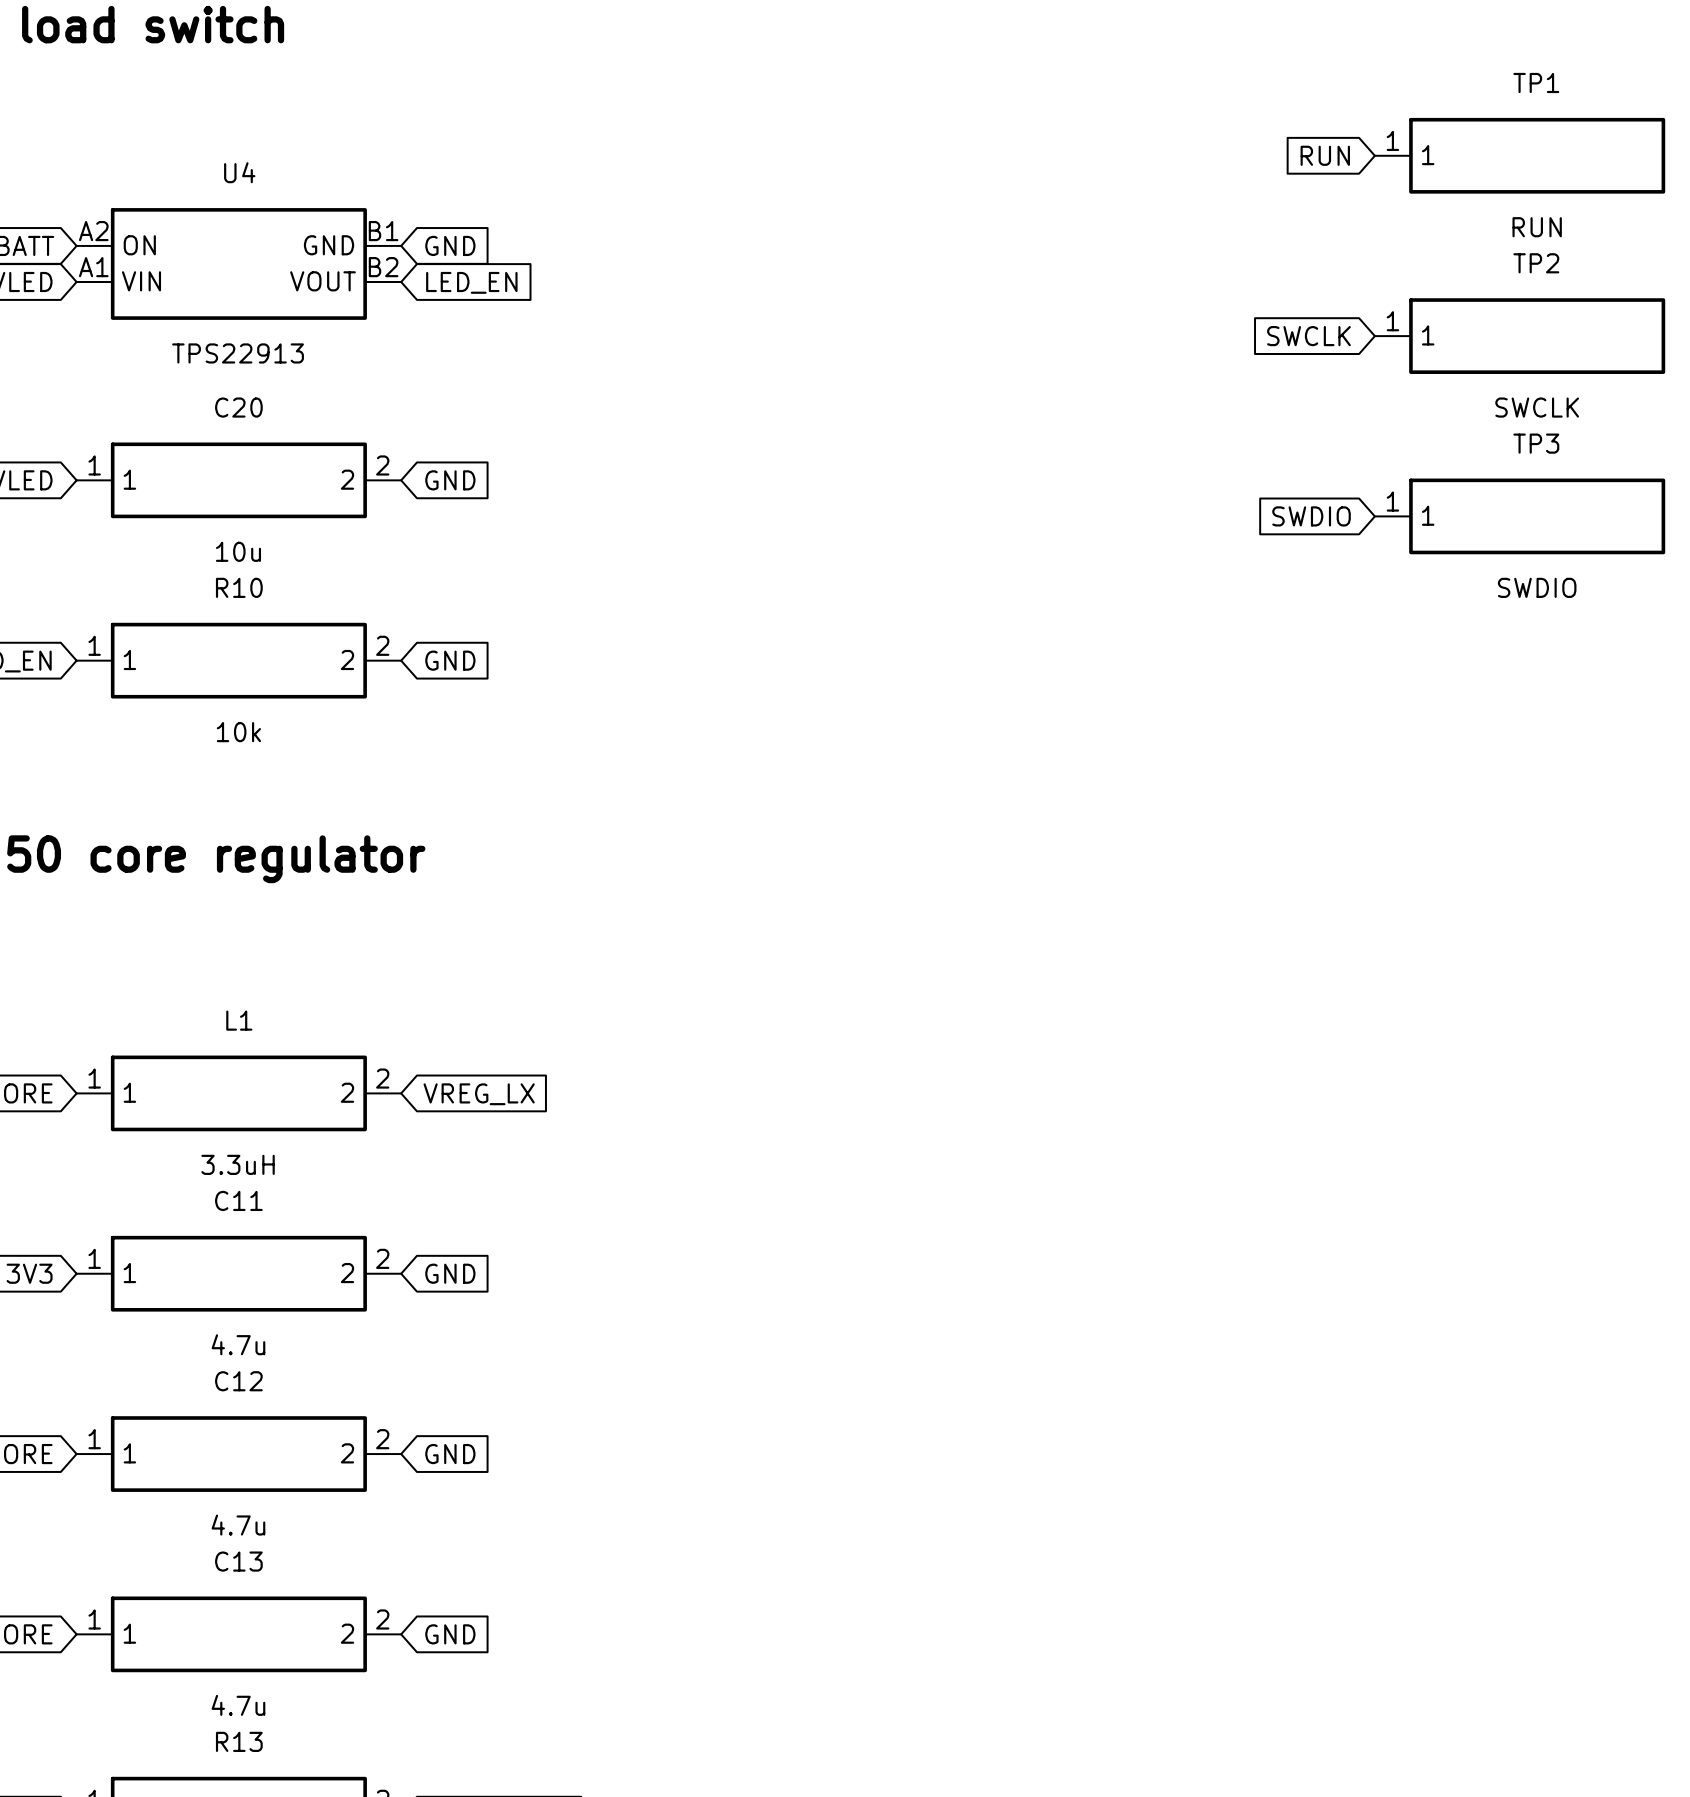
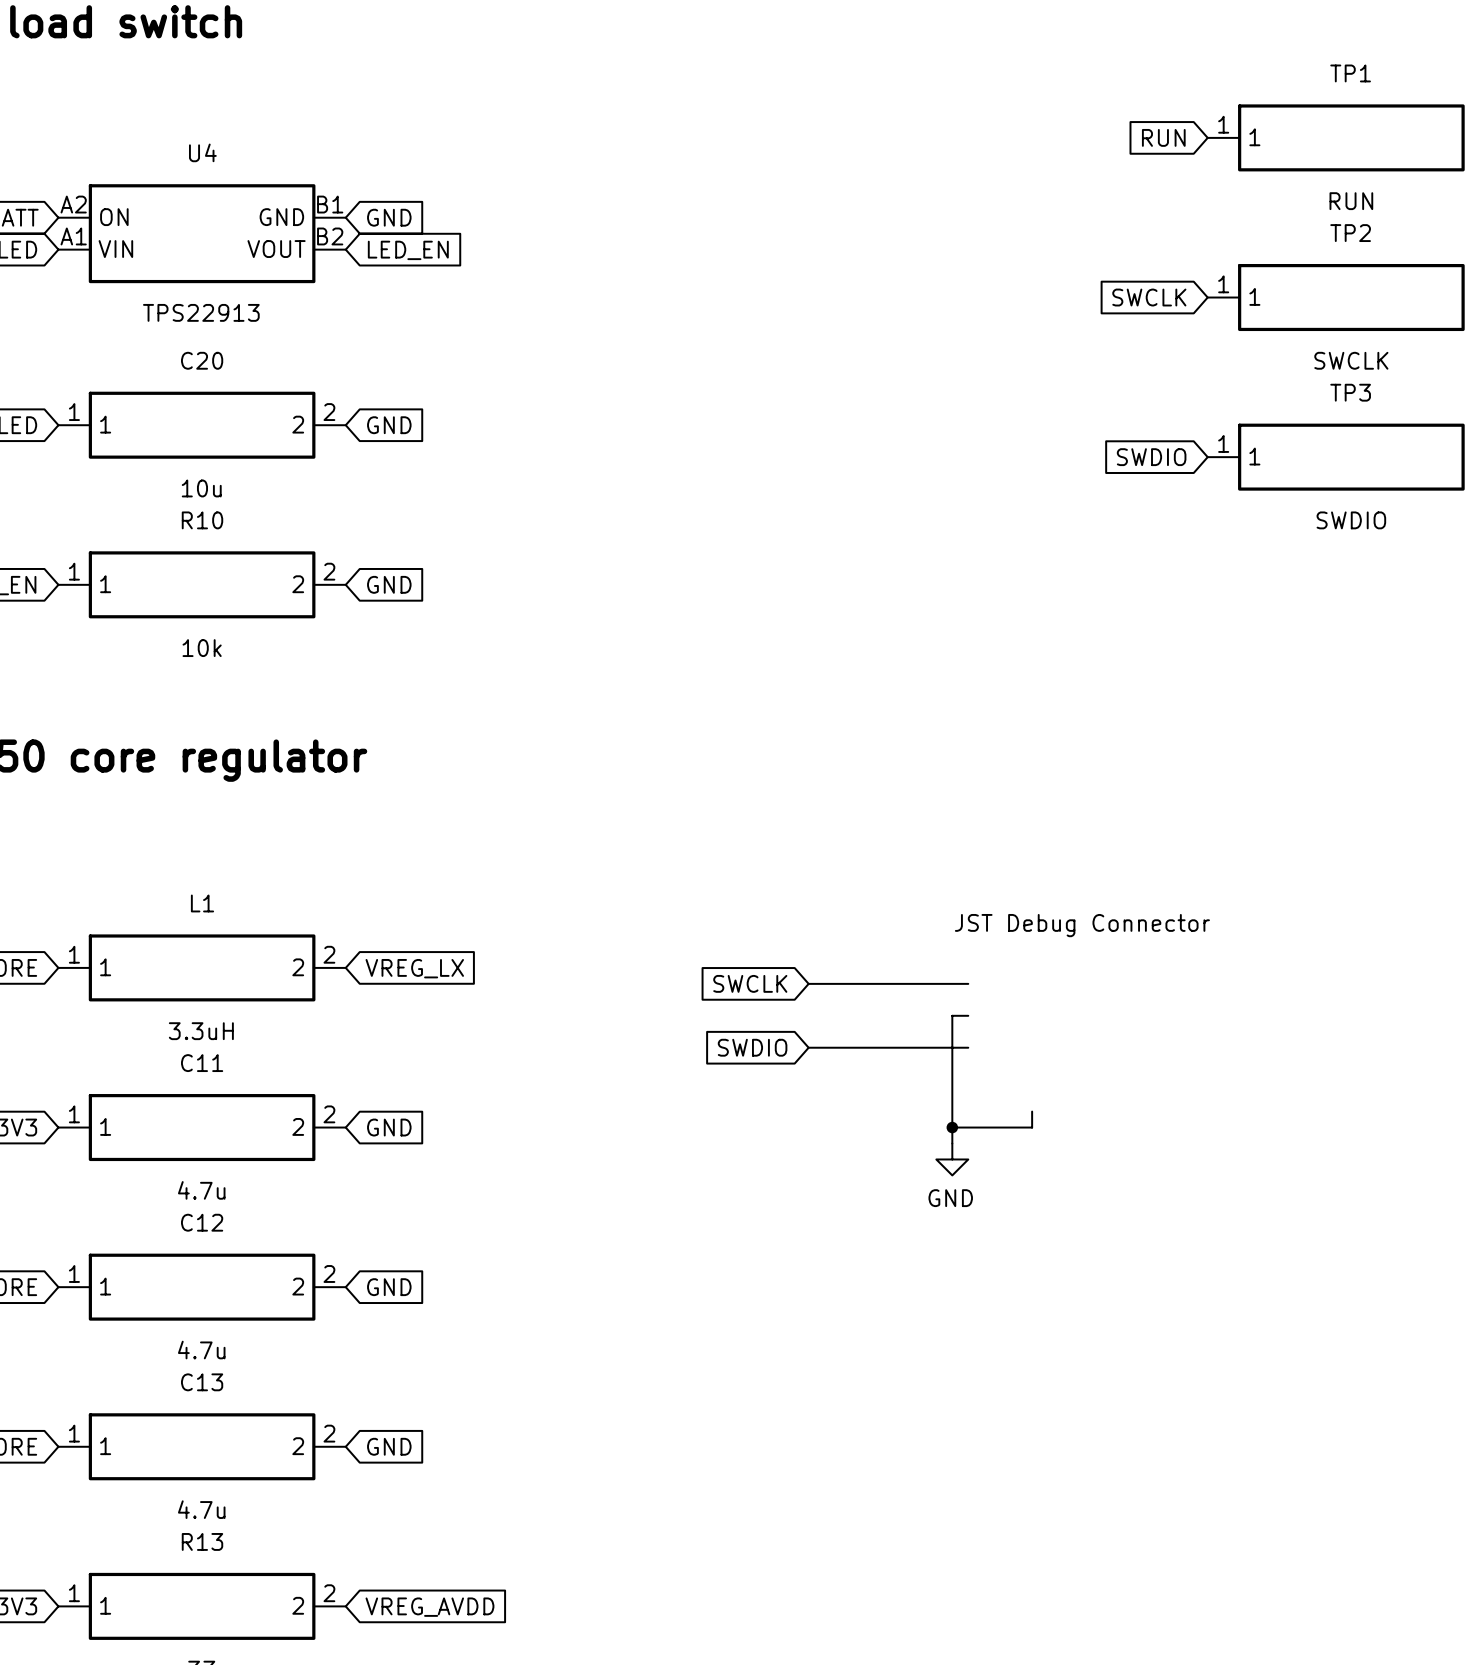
text: none -> JST Debug Connector (1082, 925)
global label: none -> SWCLK (750, 983)
wire: none -> (808, 983) (968, 983)
wire: none -> (968, 1015) (952, 1015) (952, 1143)
global label: none -> SWDIO (752, 1047)
wire: none -> (808, 1047) (968, 1047)
wire: none -> (1032, 1111) (1032, 1127) (952, 1127)
junction: none -> (952, 1127)
power symbol: none -> GND (952, 1159)

